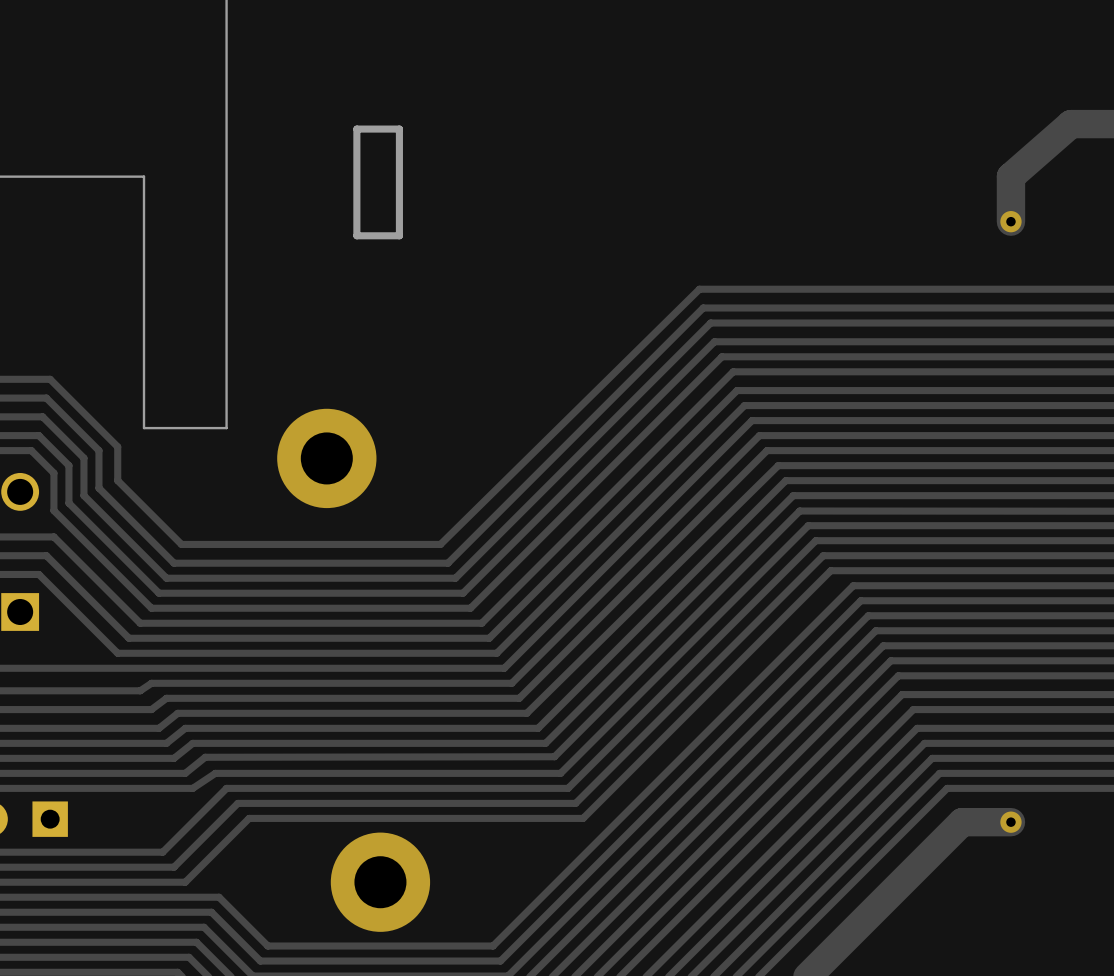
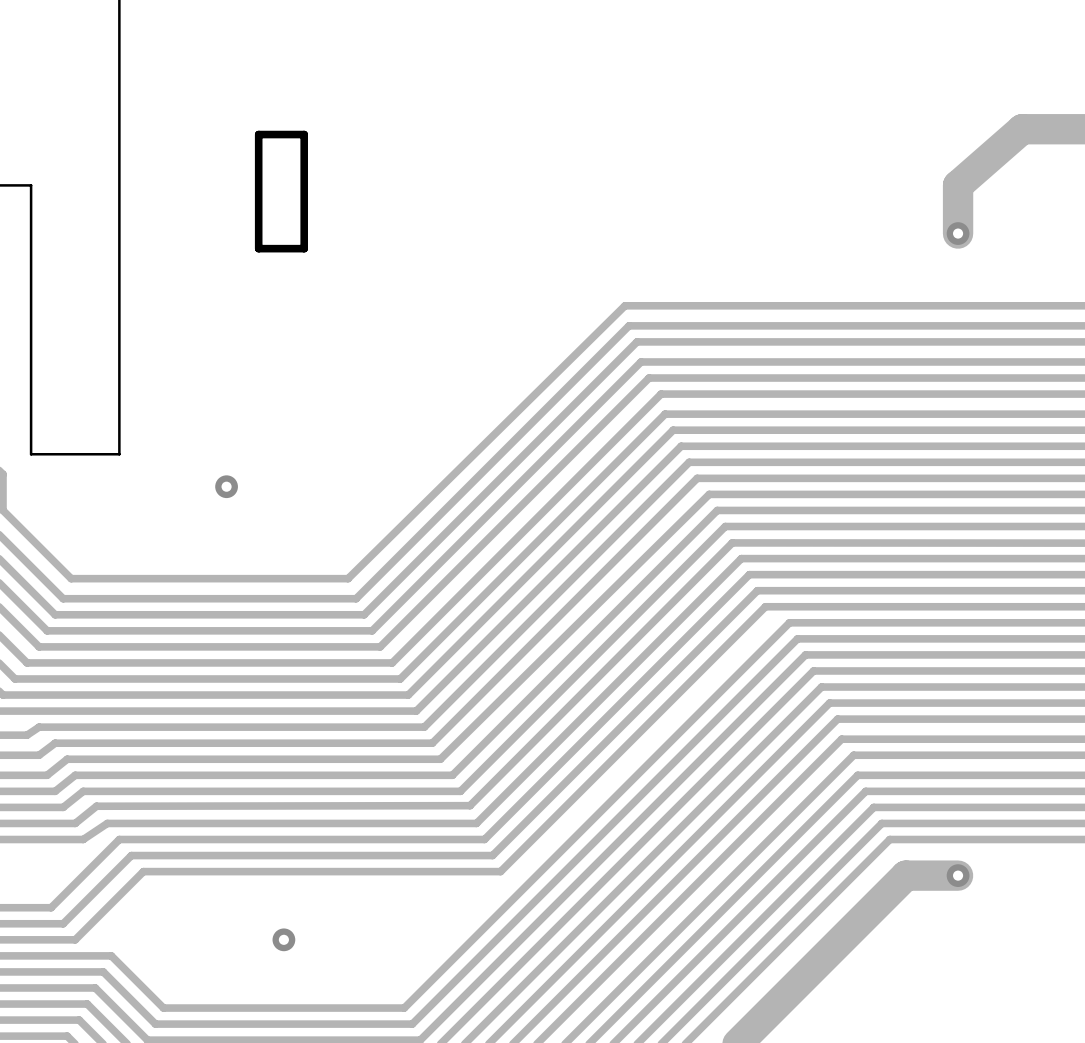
via size: [277, 408, 377, 509] -> [215, 475, 238, 499]
via size: [330, 832, 431, 932] -> [272, 928, 296, 952]

